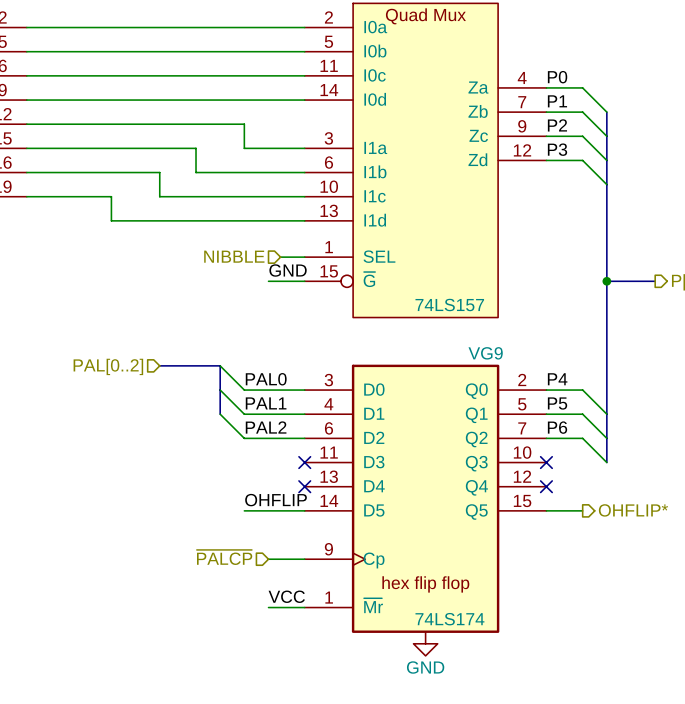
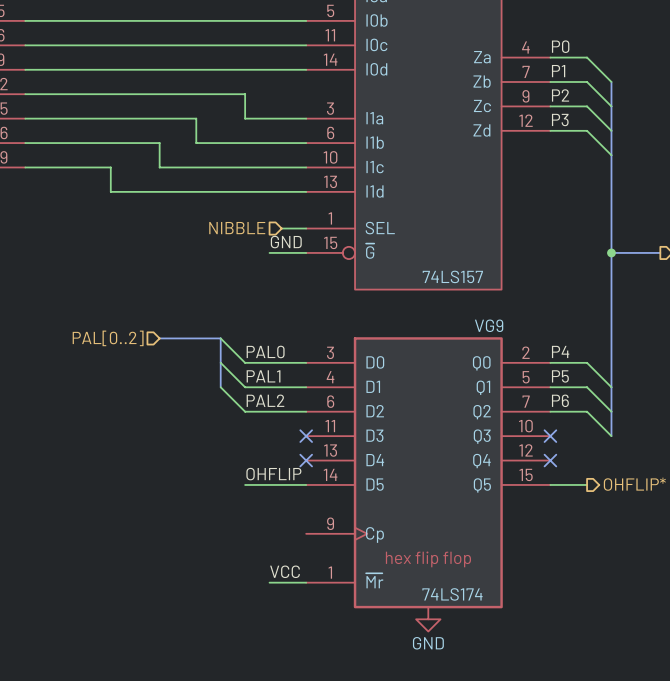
hierarchical label: ~{PALCP} (224, 557) -> none
wire: (268, 559) (304, 559) -> none

